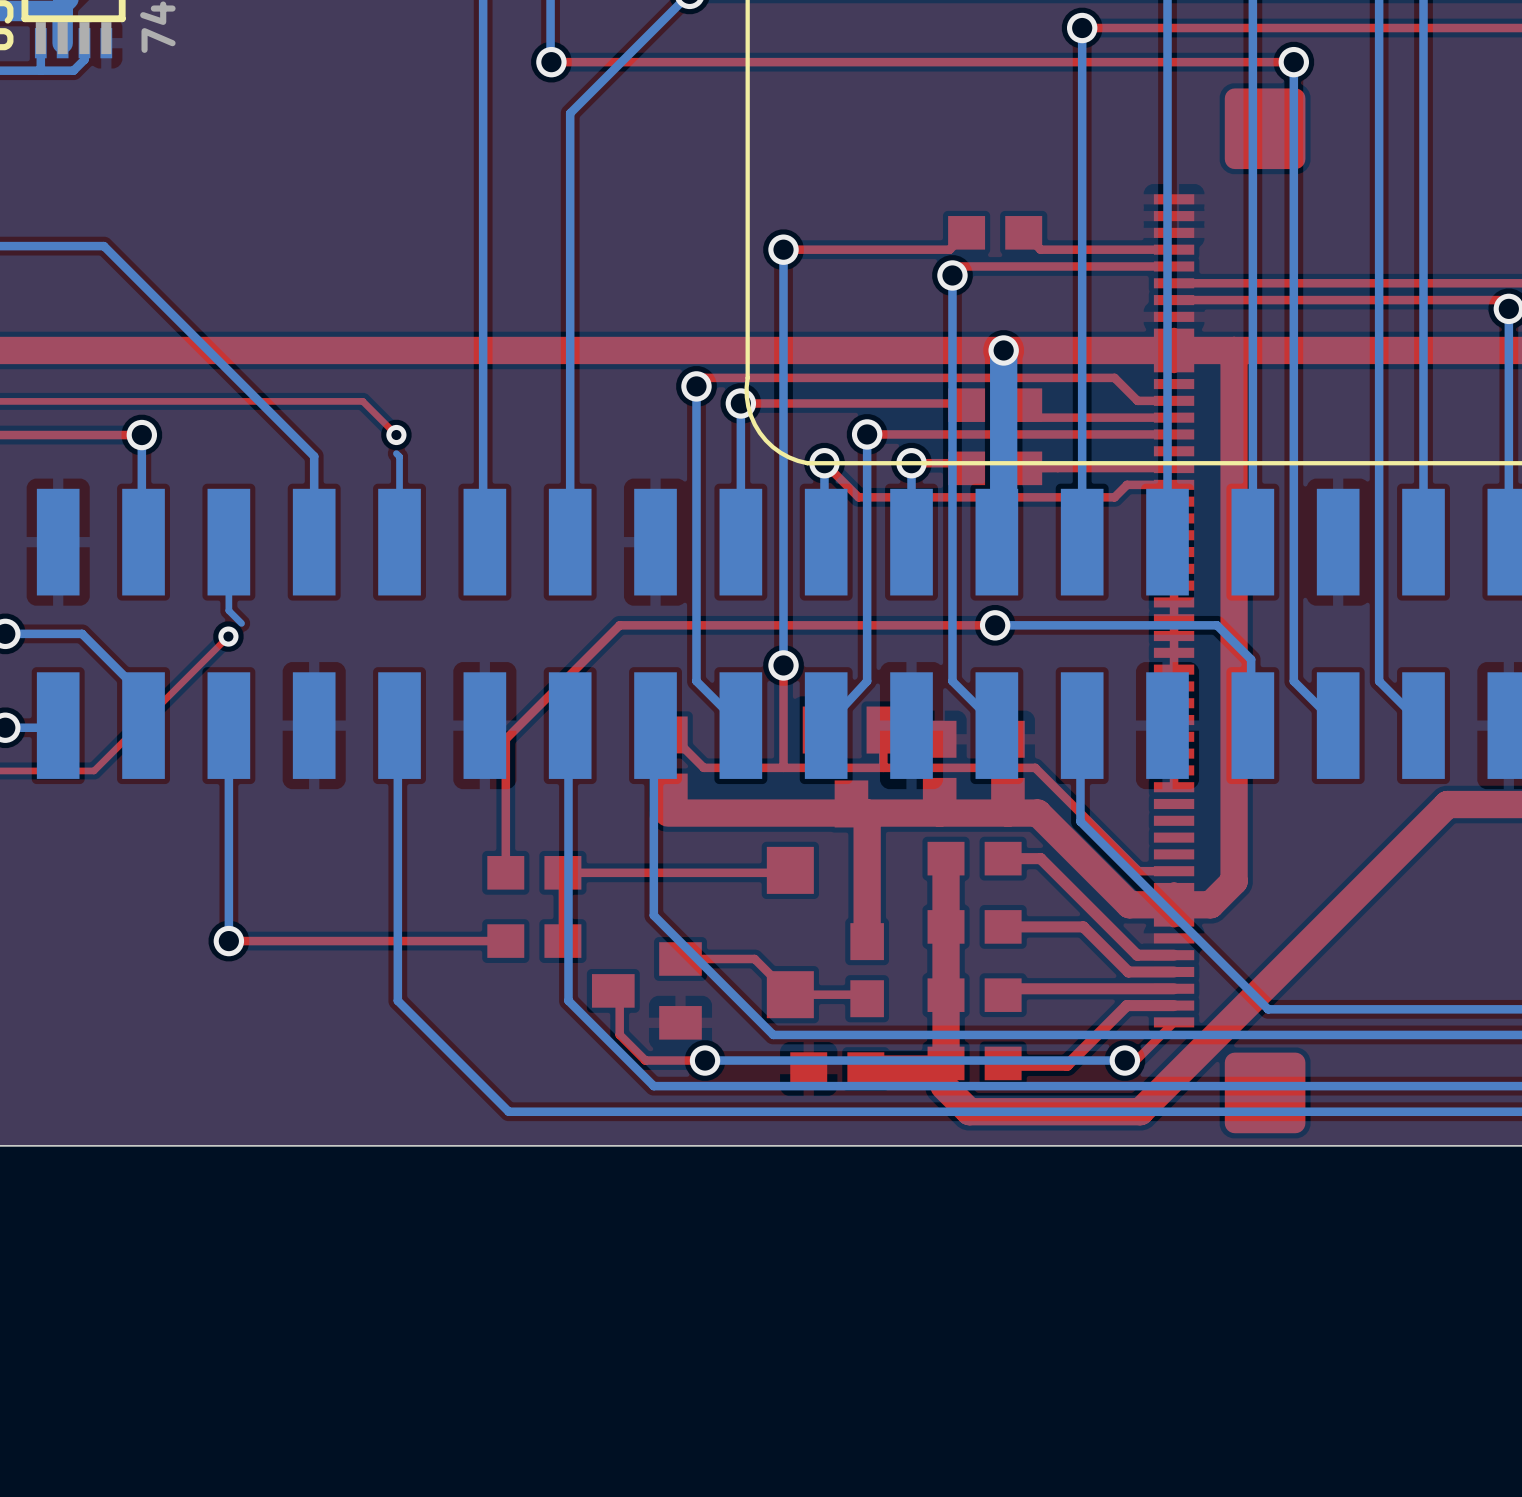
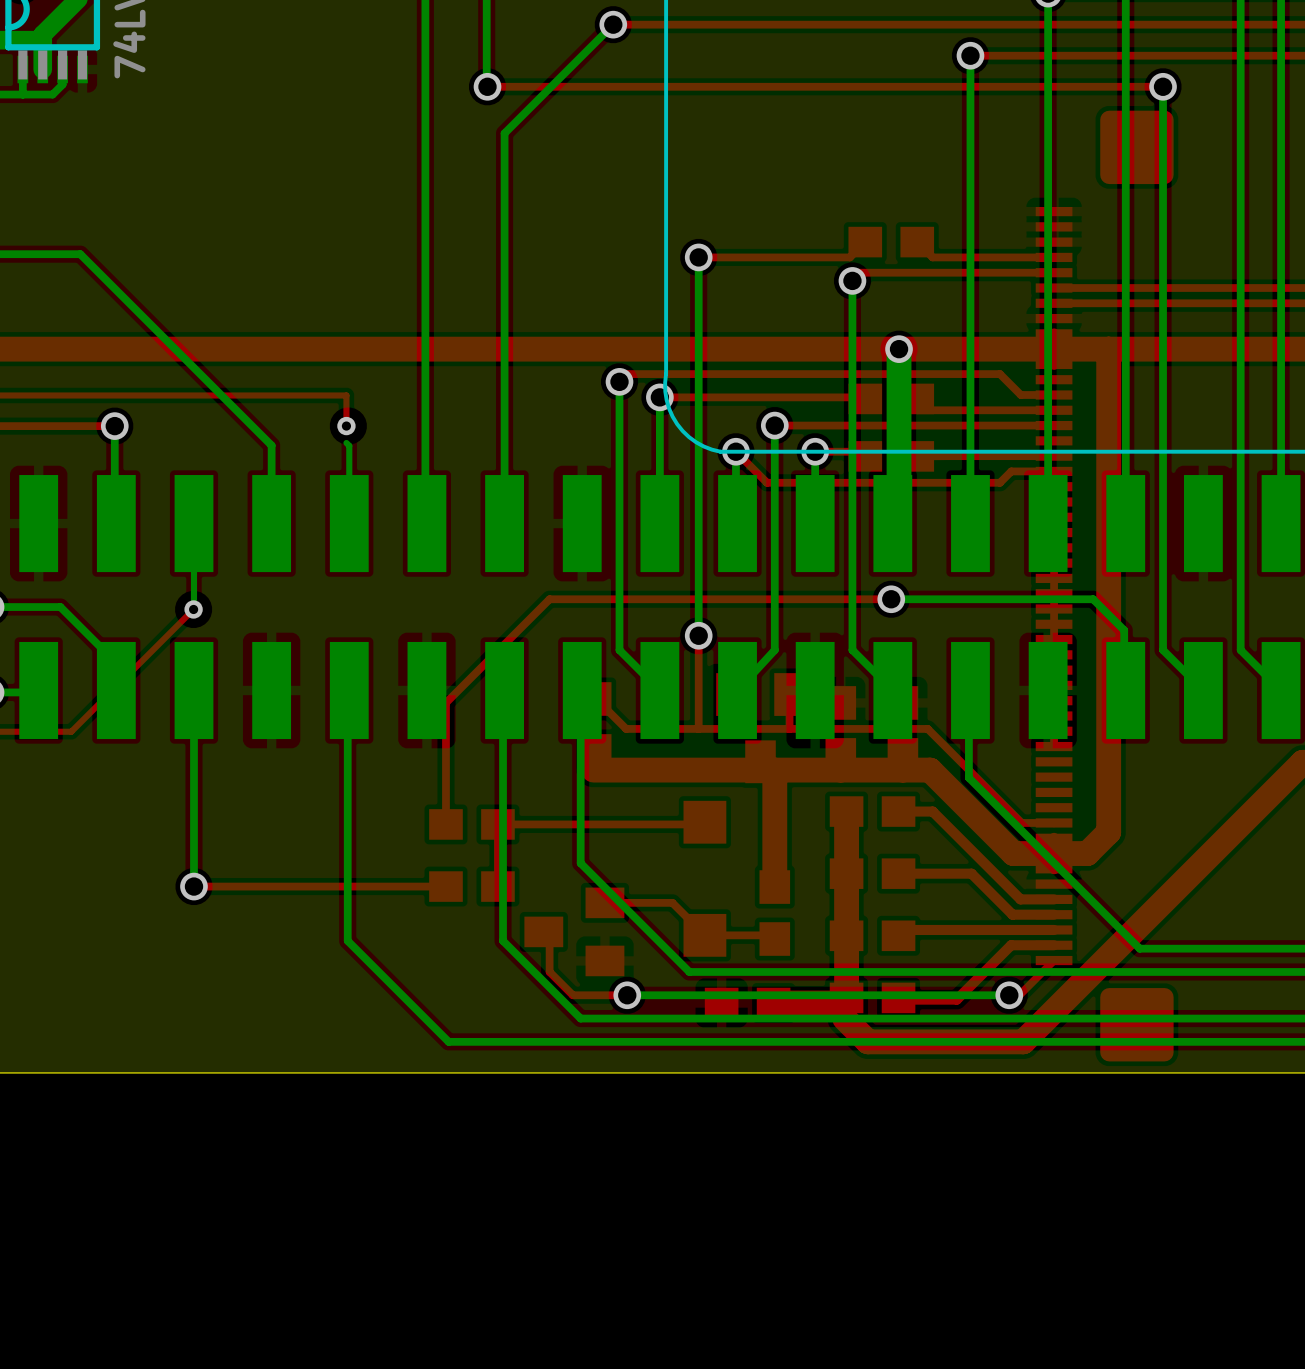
top track: (362, 401) (396, 434) -> (315, 395) (346, 395) (346, 424) (348, 426)
bottom track: (228, 610) (241, 623) -> (193, 585) (193, 609)

